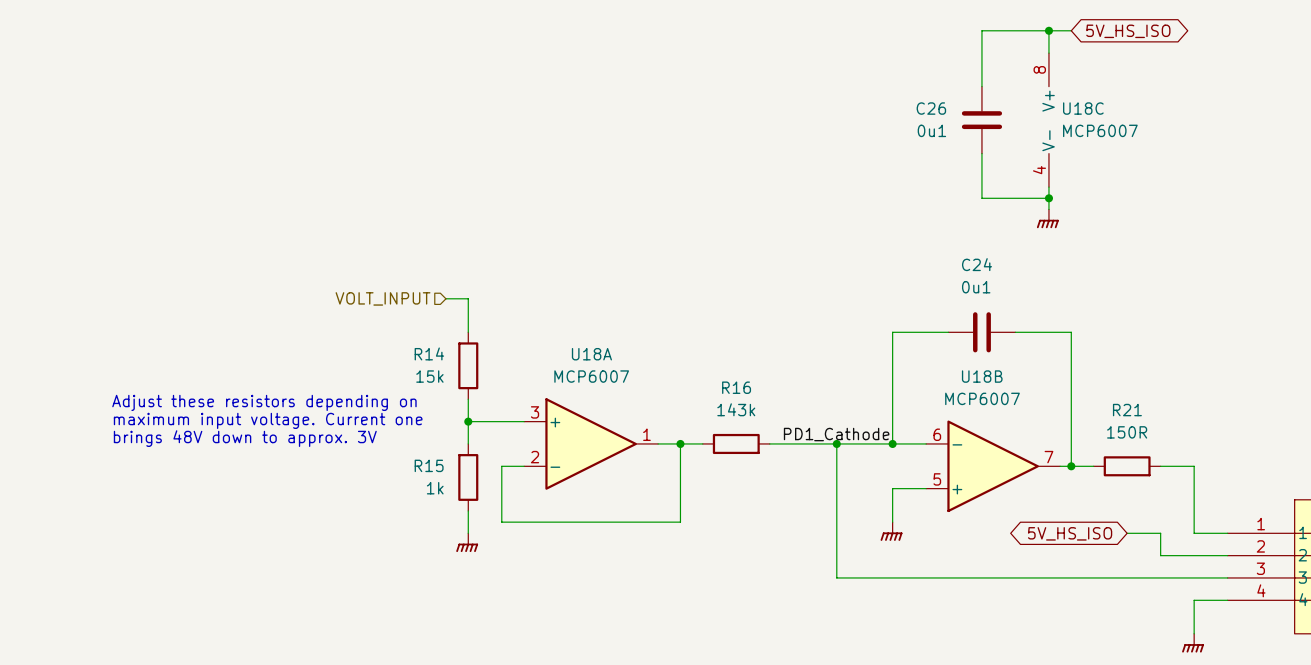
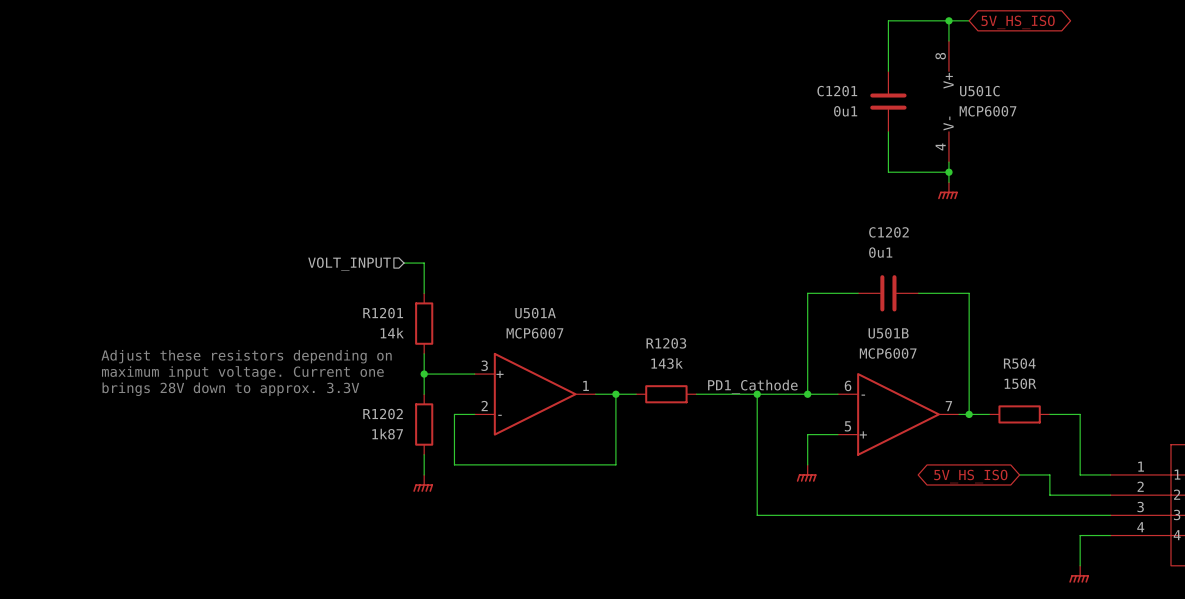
C26 name: C26 (931, 108) -> C1201 (837, 91)
U18C name: U18C (1083, 108) -> U501C (979, 91)
C24 name: C24 (977, 264) -> C1202 (888, 232)
R14 name: R14 (429, 353) -> R1201 (383, 313)
U18A name: U18A (591, 354) -> U501A (535, 313)
R14 value: 15k (429, 376) -> 14k (392, 333)
U18B name: U18B (982, 376) -> U501B (888, 333)
R16 name: R16 (736, 387) -> R1203 (666, 343)
R21 name: R21 (1127, 410) -> R504 (1019, 363)
text: brings 48V down to approx. 3V (245, 438) -> brings 28V down to approx. 3.3V (230, 389)
R15 name: R15 (429, 465) -> R1202 (383, 414)
R15 value: 1k (435, 488) -> 1k87 (387, 434)

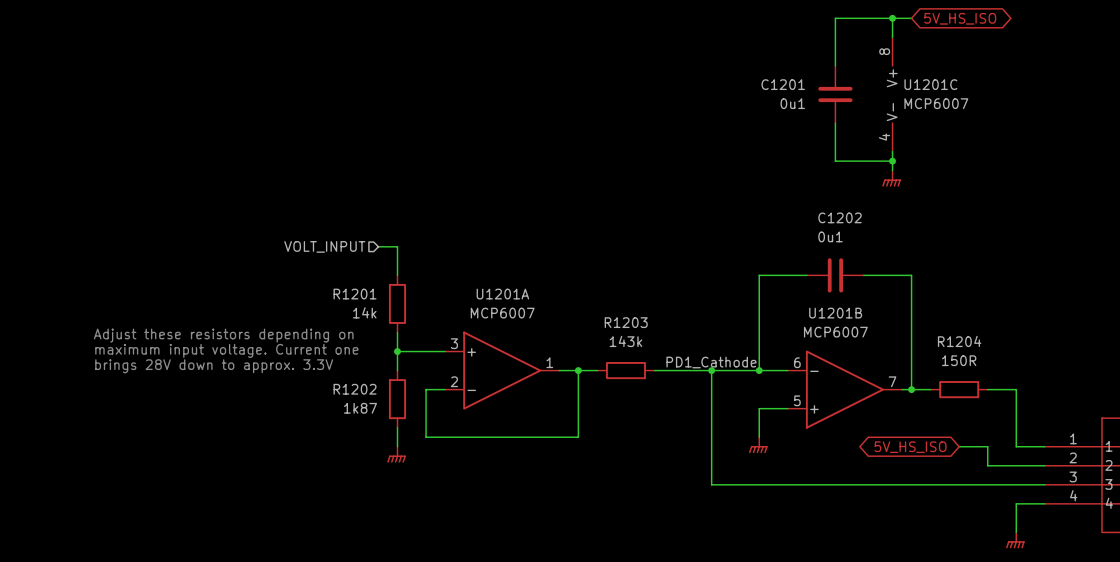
U501C name: U501C (979, 91) -> U1201C (930, 84)
U501A name: U501A (535, 313) -> U1201A (502, 294)
U501B name: U501B (888, 333) -> U1201B (835, 313)
R504 name: R504 (1019, 363) -> R1204 (959, 341)

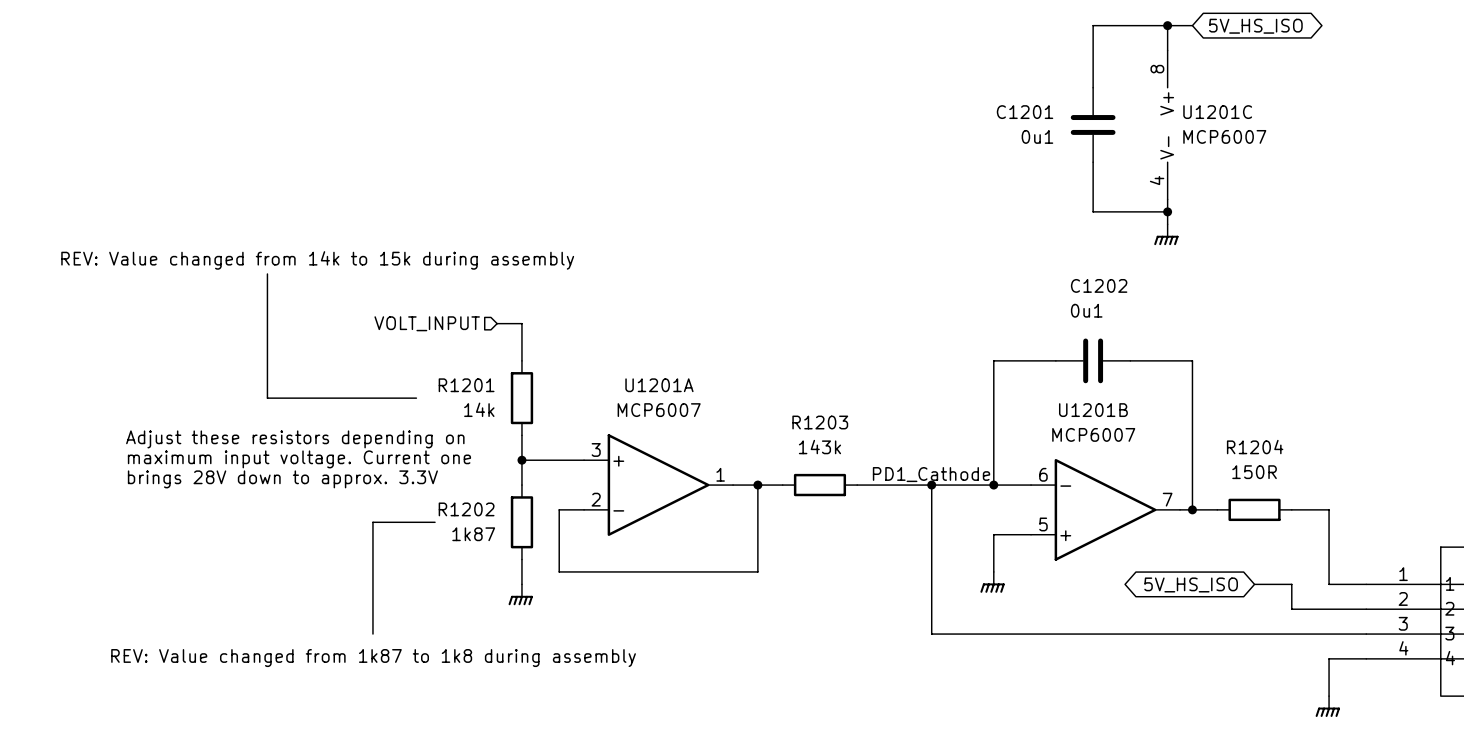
text: none -> REV: Value changed from 14k to 15k during assembly (317, 260)
line: none -> (267, 273) (267, 398) (416, 398)
line: none -> (435, 522) (372, 522) (372, 634)
text: none -> REV: Value changed from 1k87 to 1k8 during assembly (373, 658)

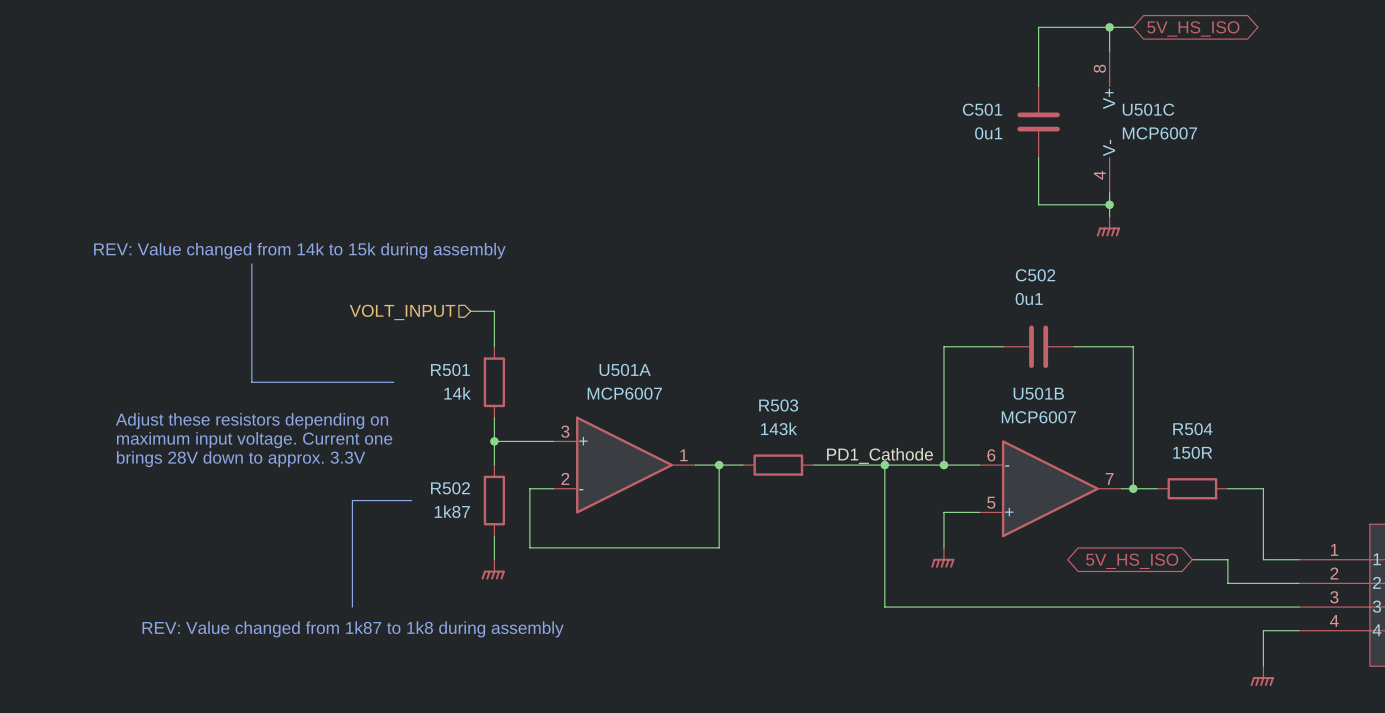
C1201 name: C1201 (1025, 112) -> C501 (982, 109)
U1201C name: U1201C (1217, 112) -> U501C (1148, 109)
C1202 name: C1202 (1099, 285) -> C502 (1035, 275)
R1201 name: R1201 (466, 385) -> R501 (450, 369)
U1201A name: U1201A (659, 385) -> U501A (625, 369)
U1201B name: U1201B (1093, 410) -> U501B (1038, 393)
R1203 name: R1203 (820, 422) -> R503 (778, 405)
R1204 name: R1204 (1255, 447) -> R504 (1192, 429)
R1202 name: R1202 (466, 509) -> R502 (450, 488)

